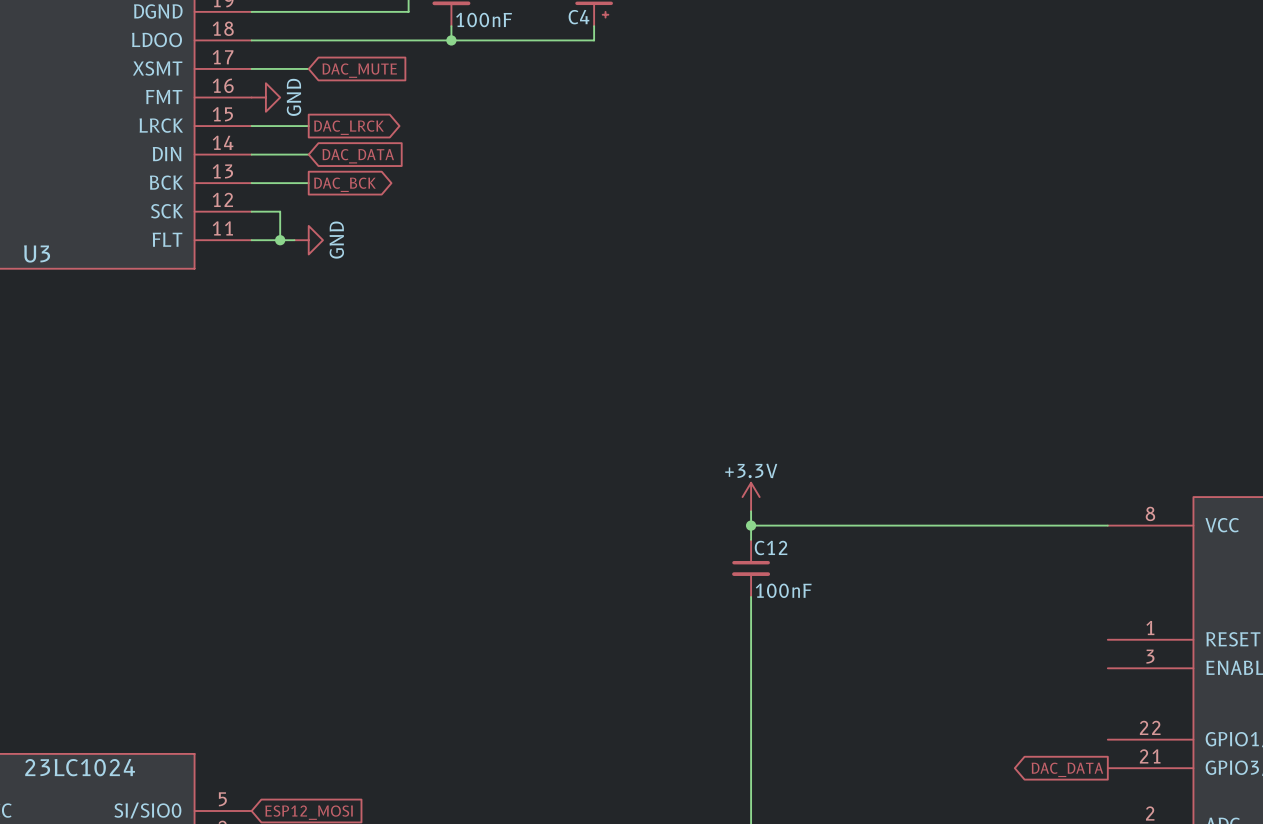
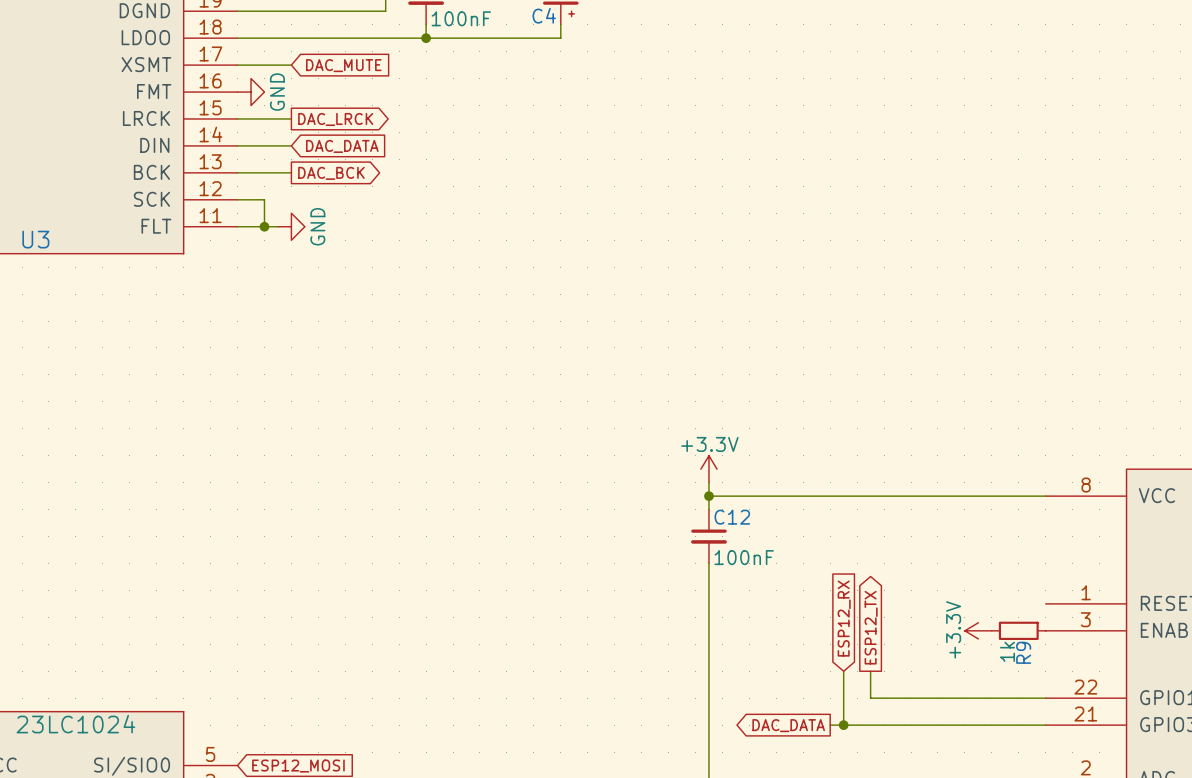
global label: none -> ESP12_RX (844, 618)
power symbol: none -> +3.3V (978, 630)
R9: none -> 1k (1018, 630)
global label: none -> ESP12_TX (871, 627)
wire: none -> (843, 671) (843, 725)
wire: none -> (870, 671) (870, 698) (1045, 698)
wire: none -> (830, 725) (1045, 725)
junction: none -> (843, 725)
global label position: DAC_DATA (1067, 769) -> DAC_DATA (788, 725)

